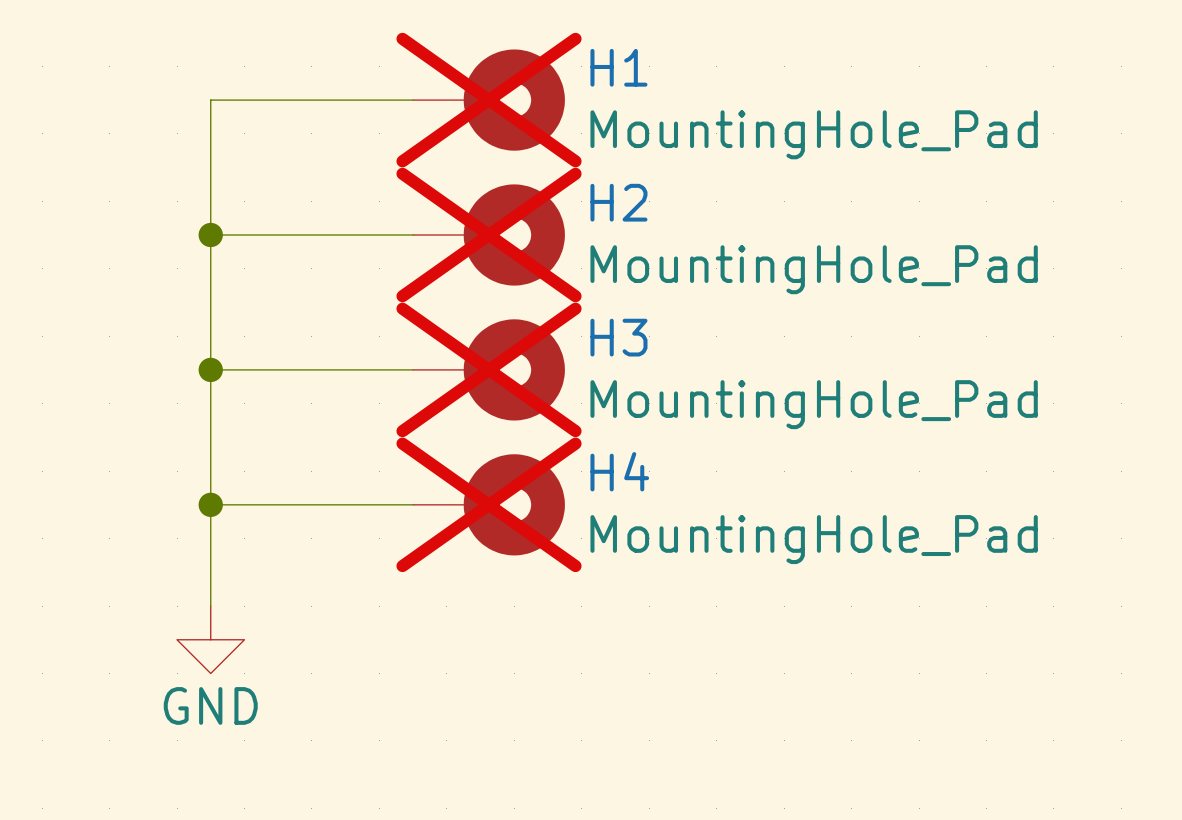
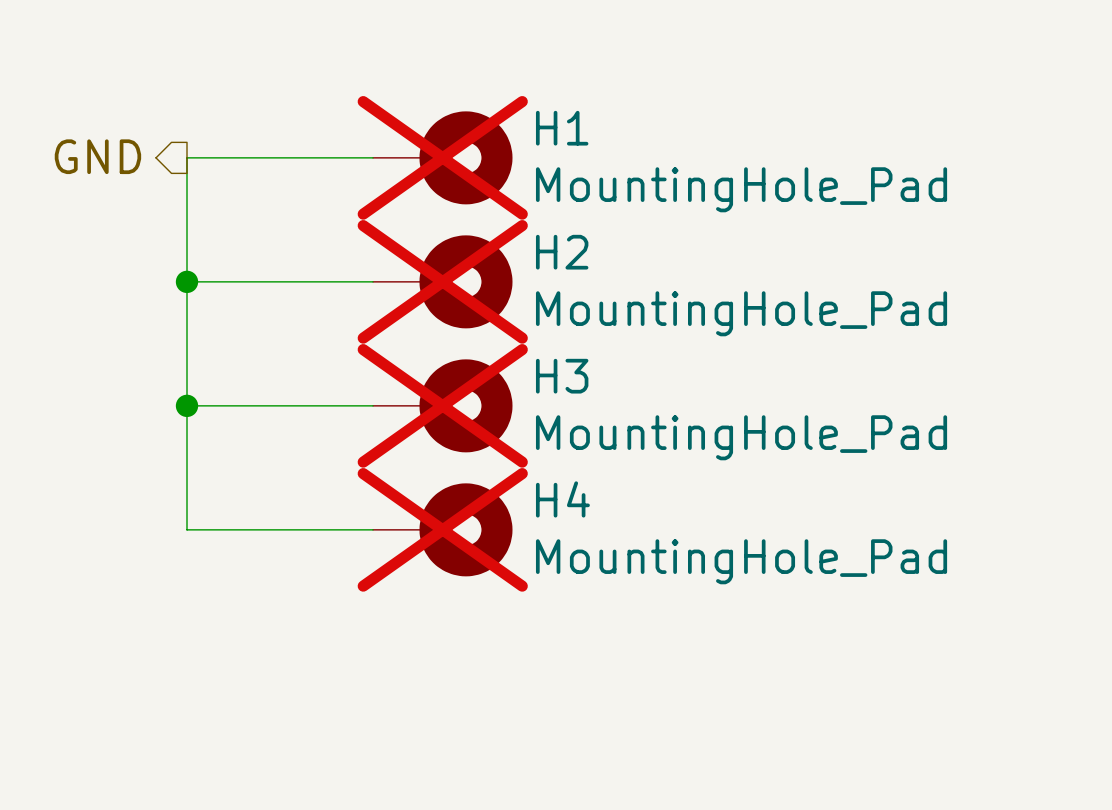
hierarchical label: none -> GND (97, 156)
wire: (210, 504) (210, 606) -> none
junction: (210, 504) -> none
power symbol: GND (210, 639) -> none

